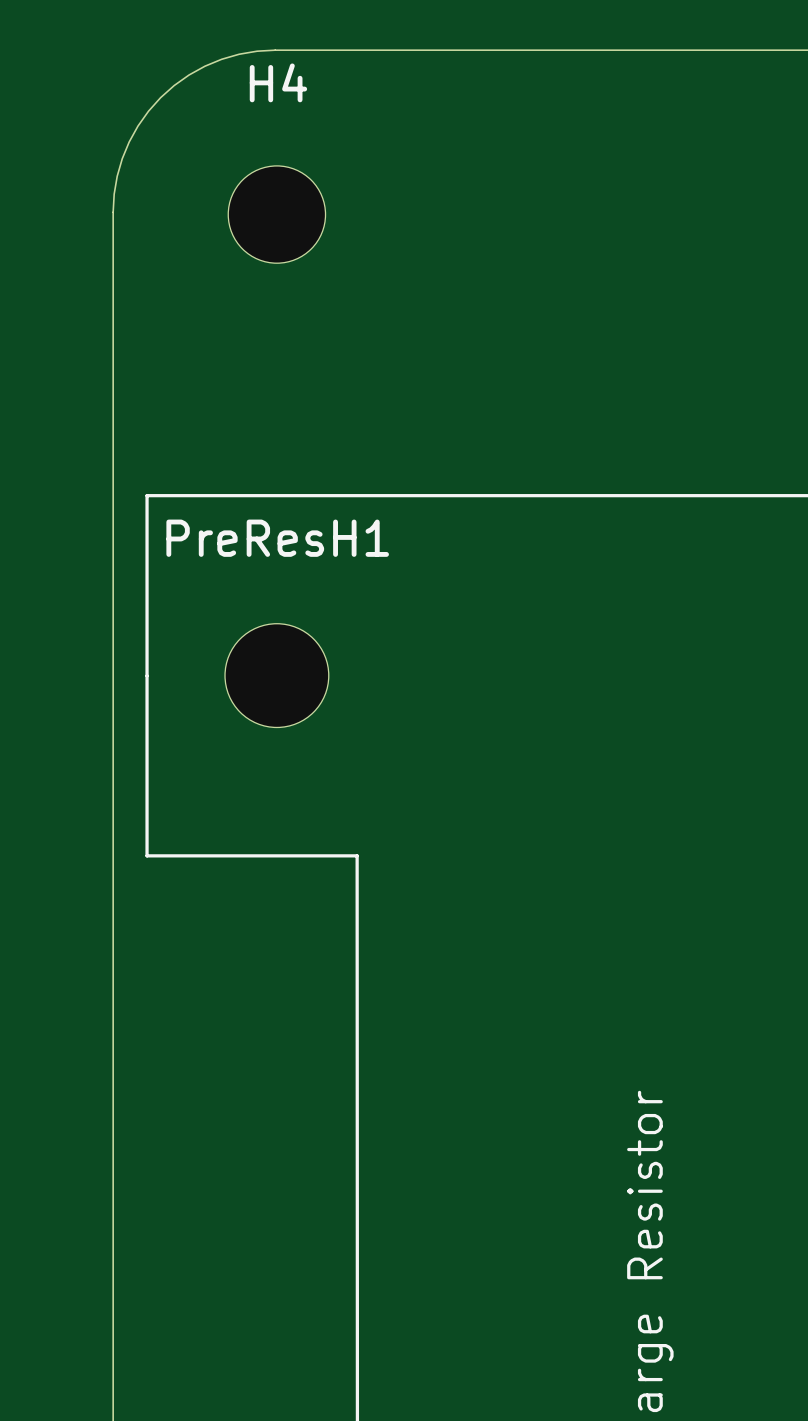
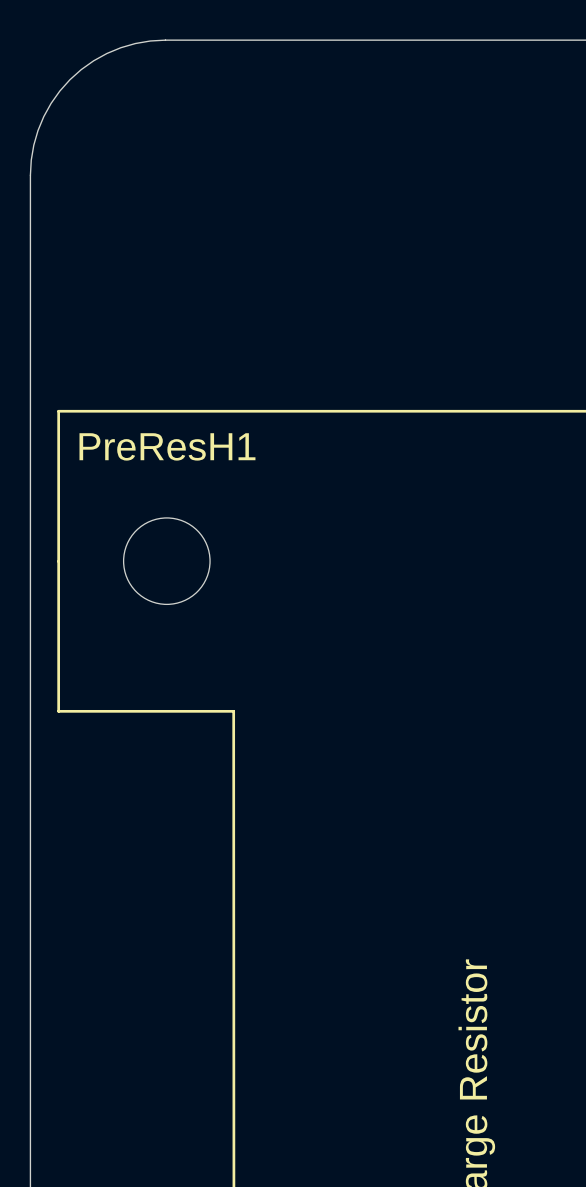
H4: (276, 214) -> none

